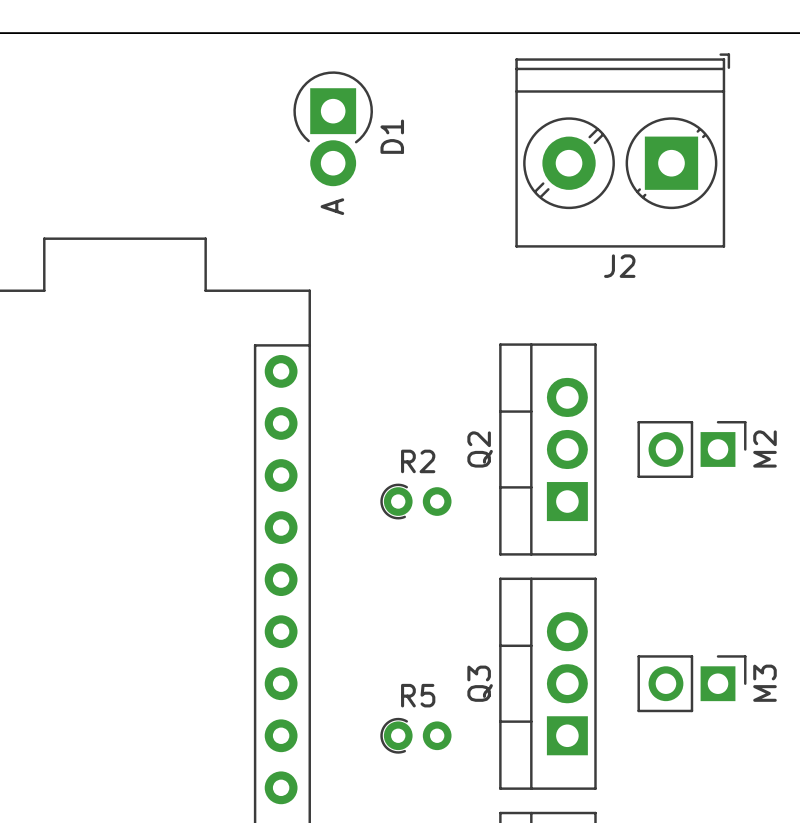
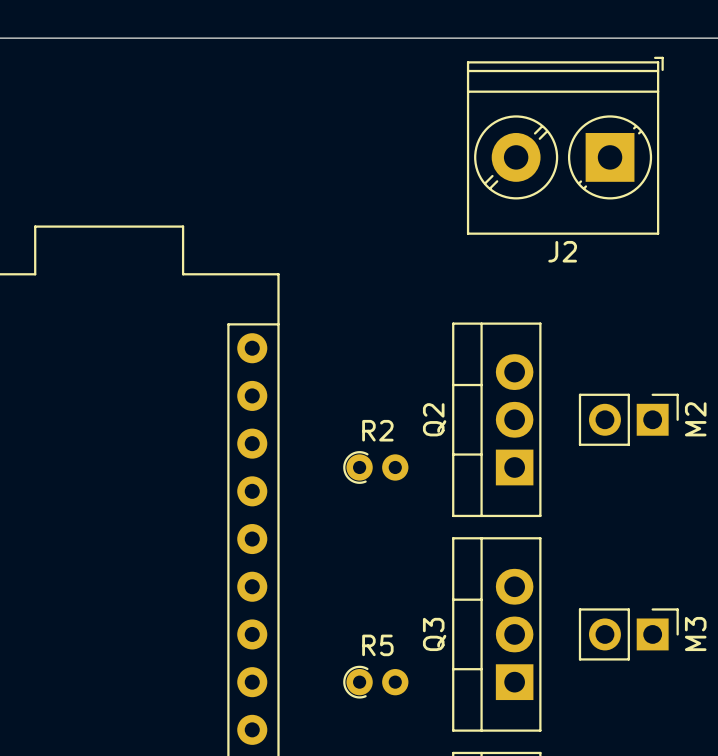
D1: (333, 128) -> none

